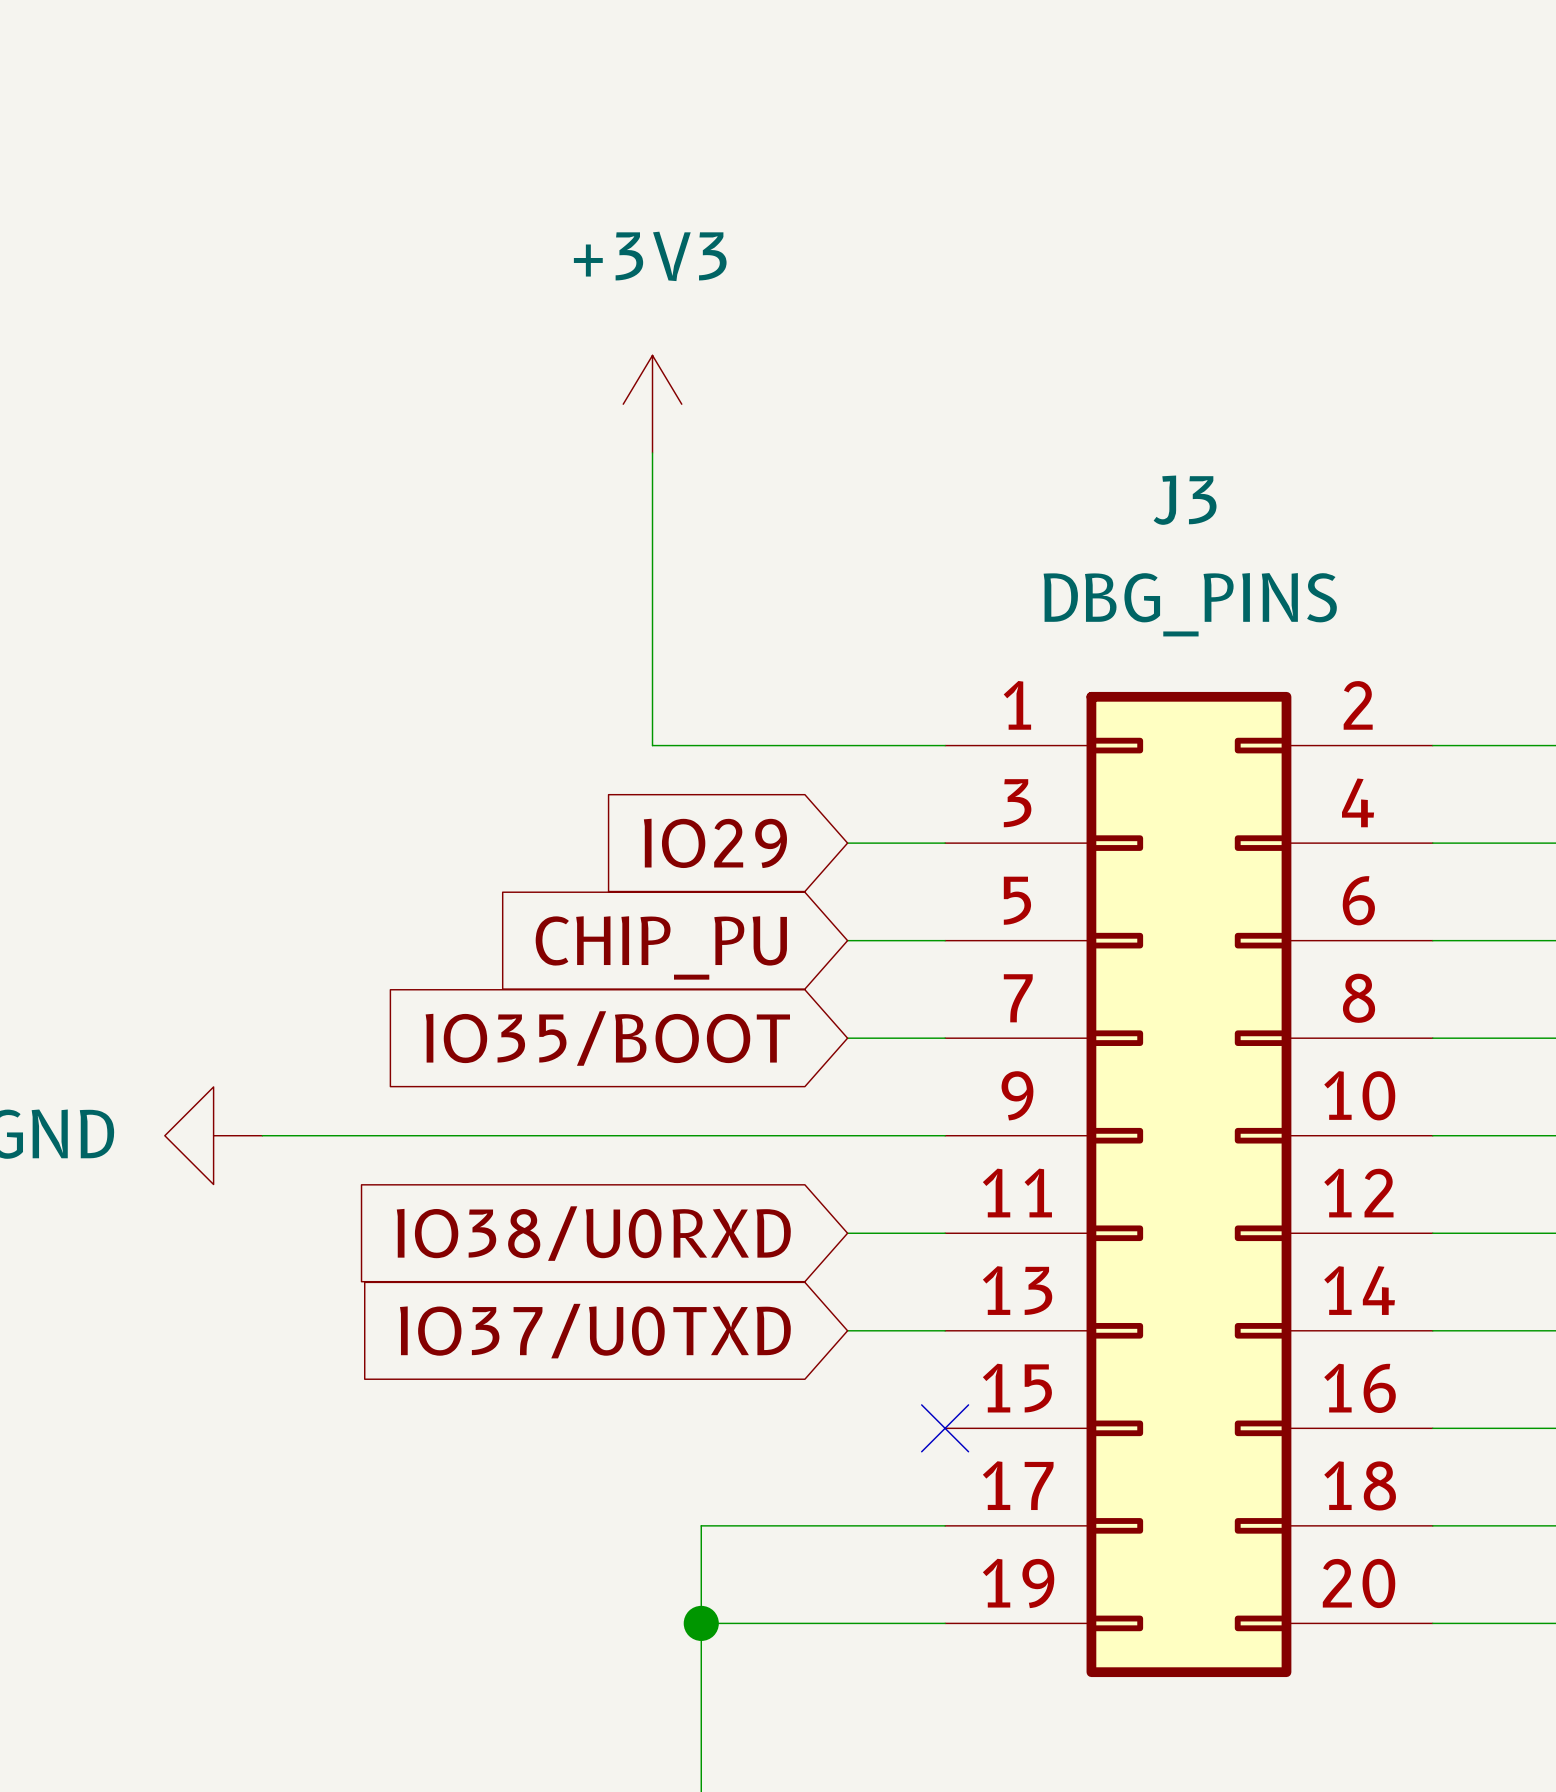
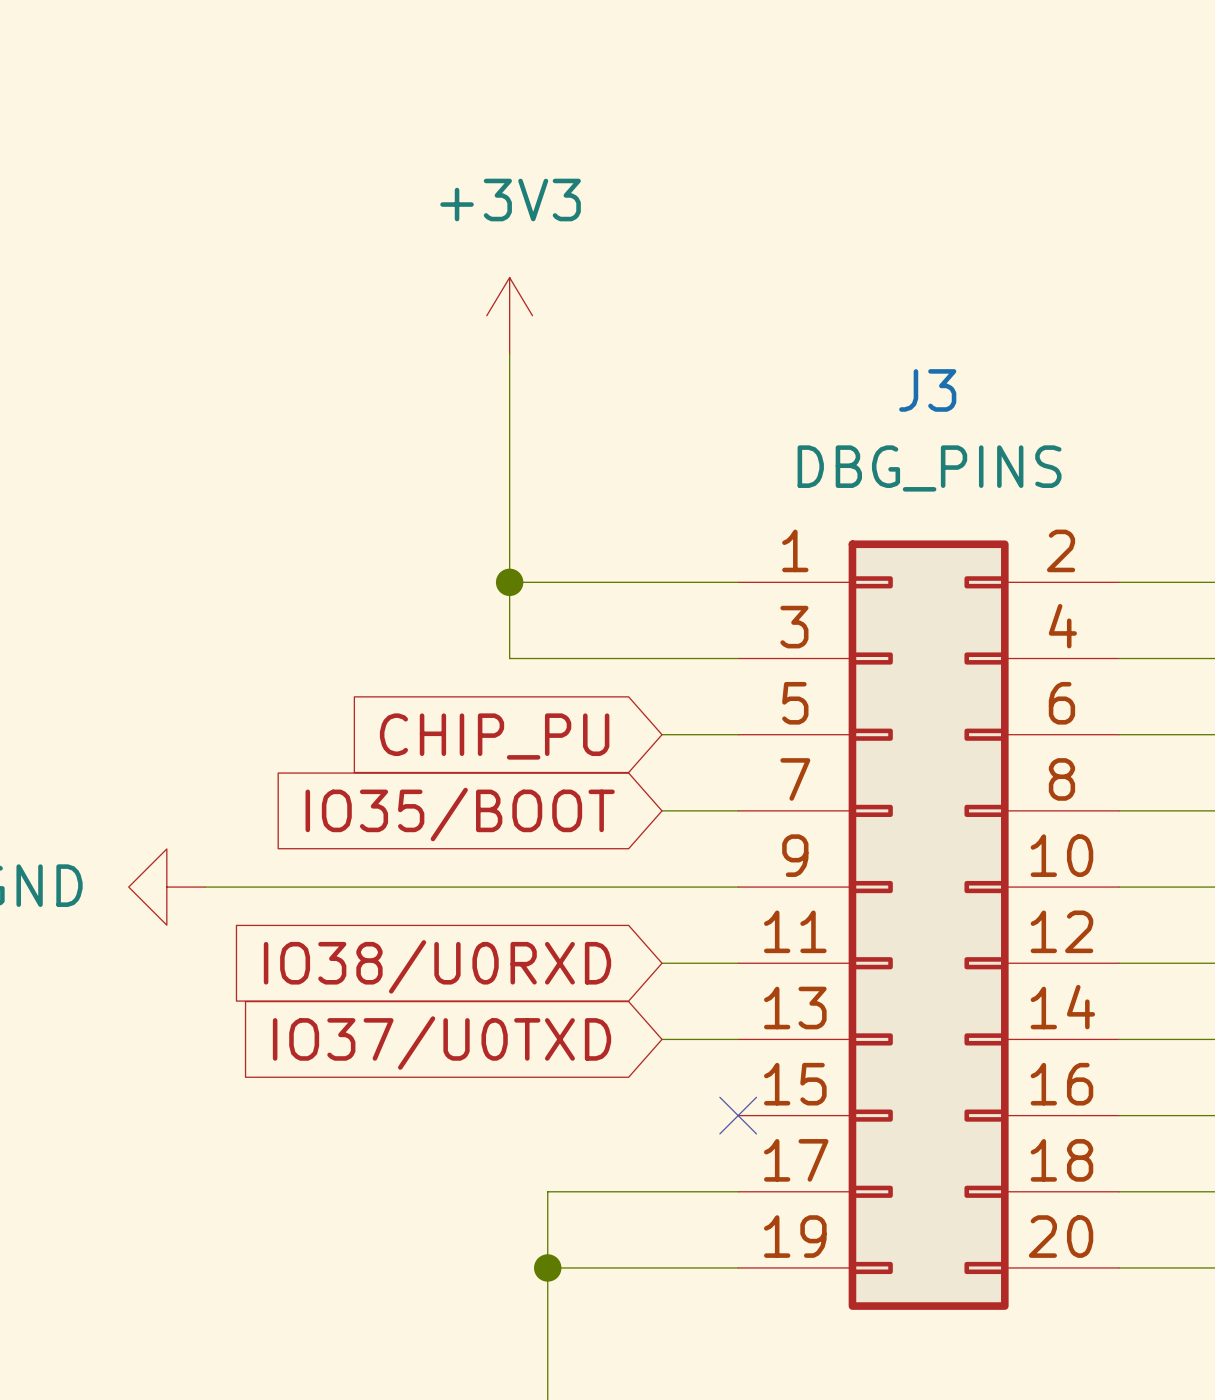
wire: none -> (509, 582) (509, 658) (662, 658)
junction: none -> (509, 582)
global label: IO29 (715, 843) -> none

